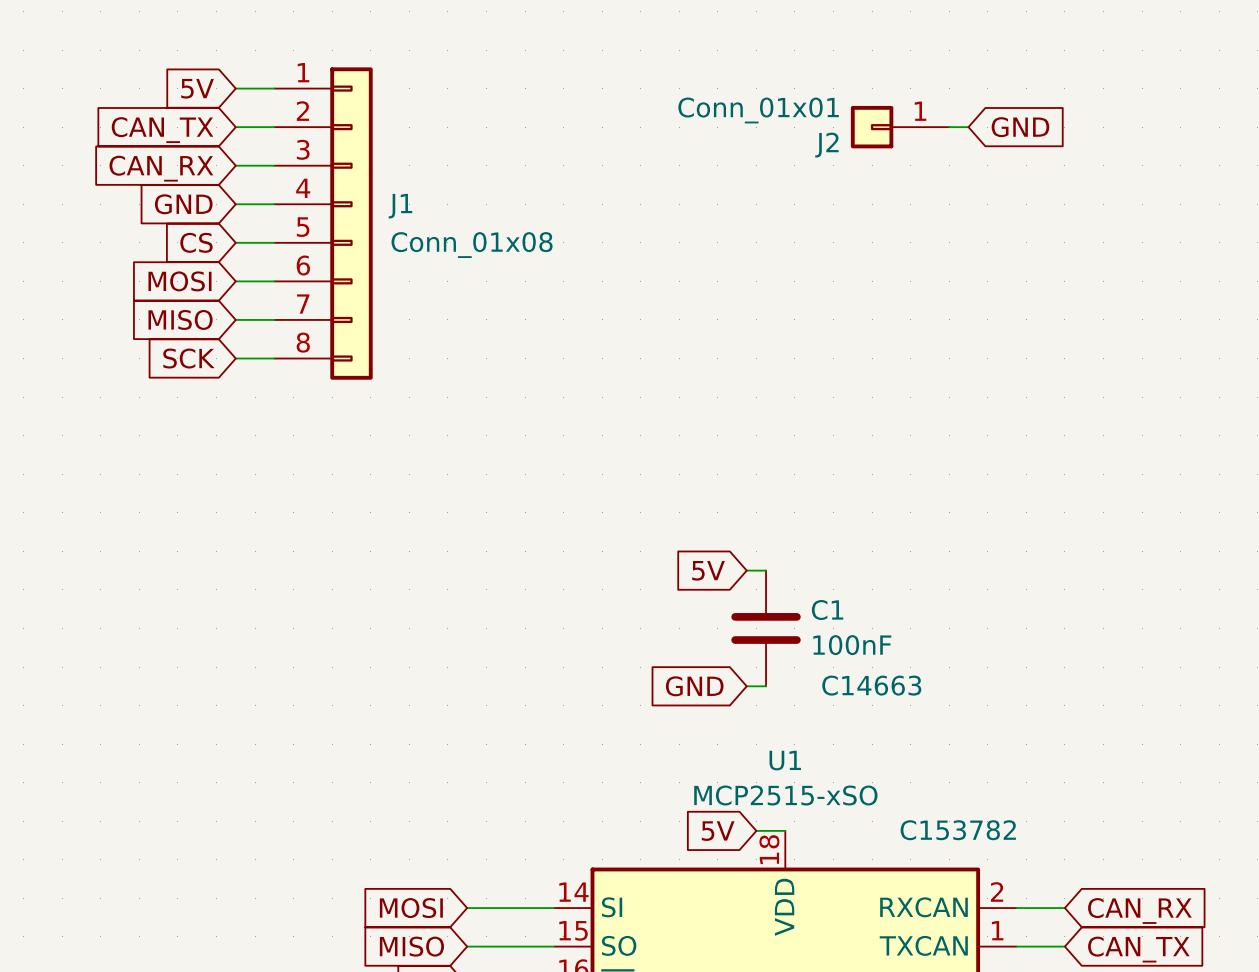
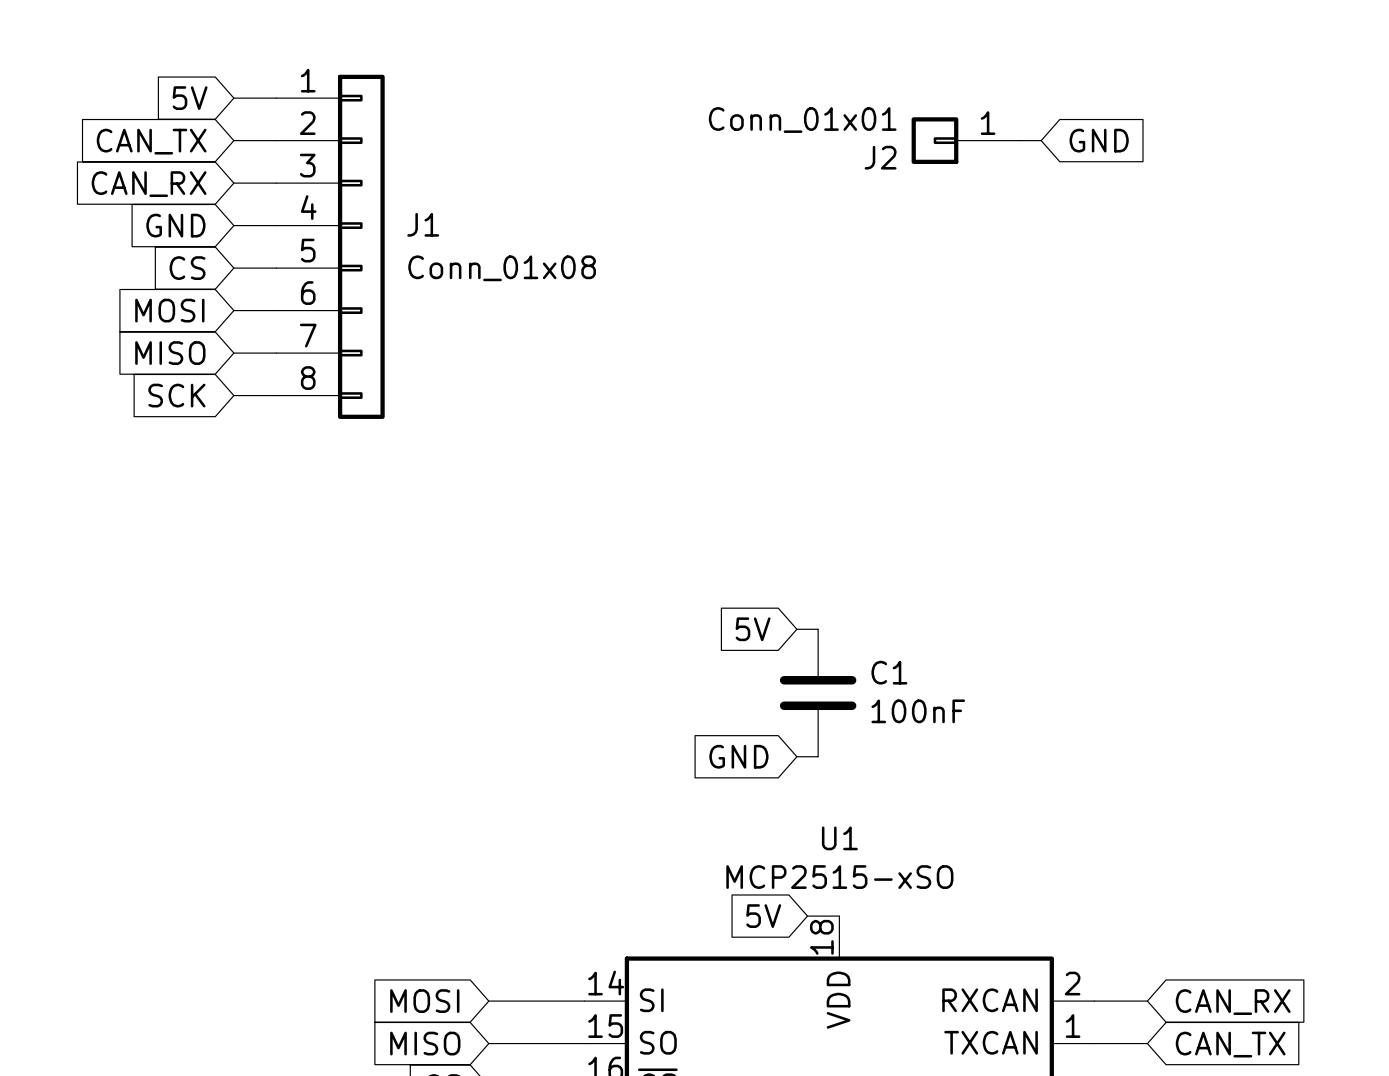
C1 text: C14663 (871, 685) -> none
U1 text: C153782 (958, 830) -> none

